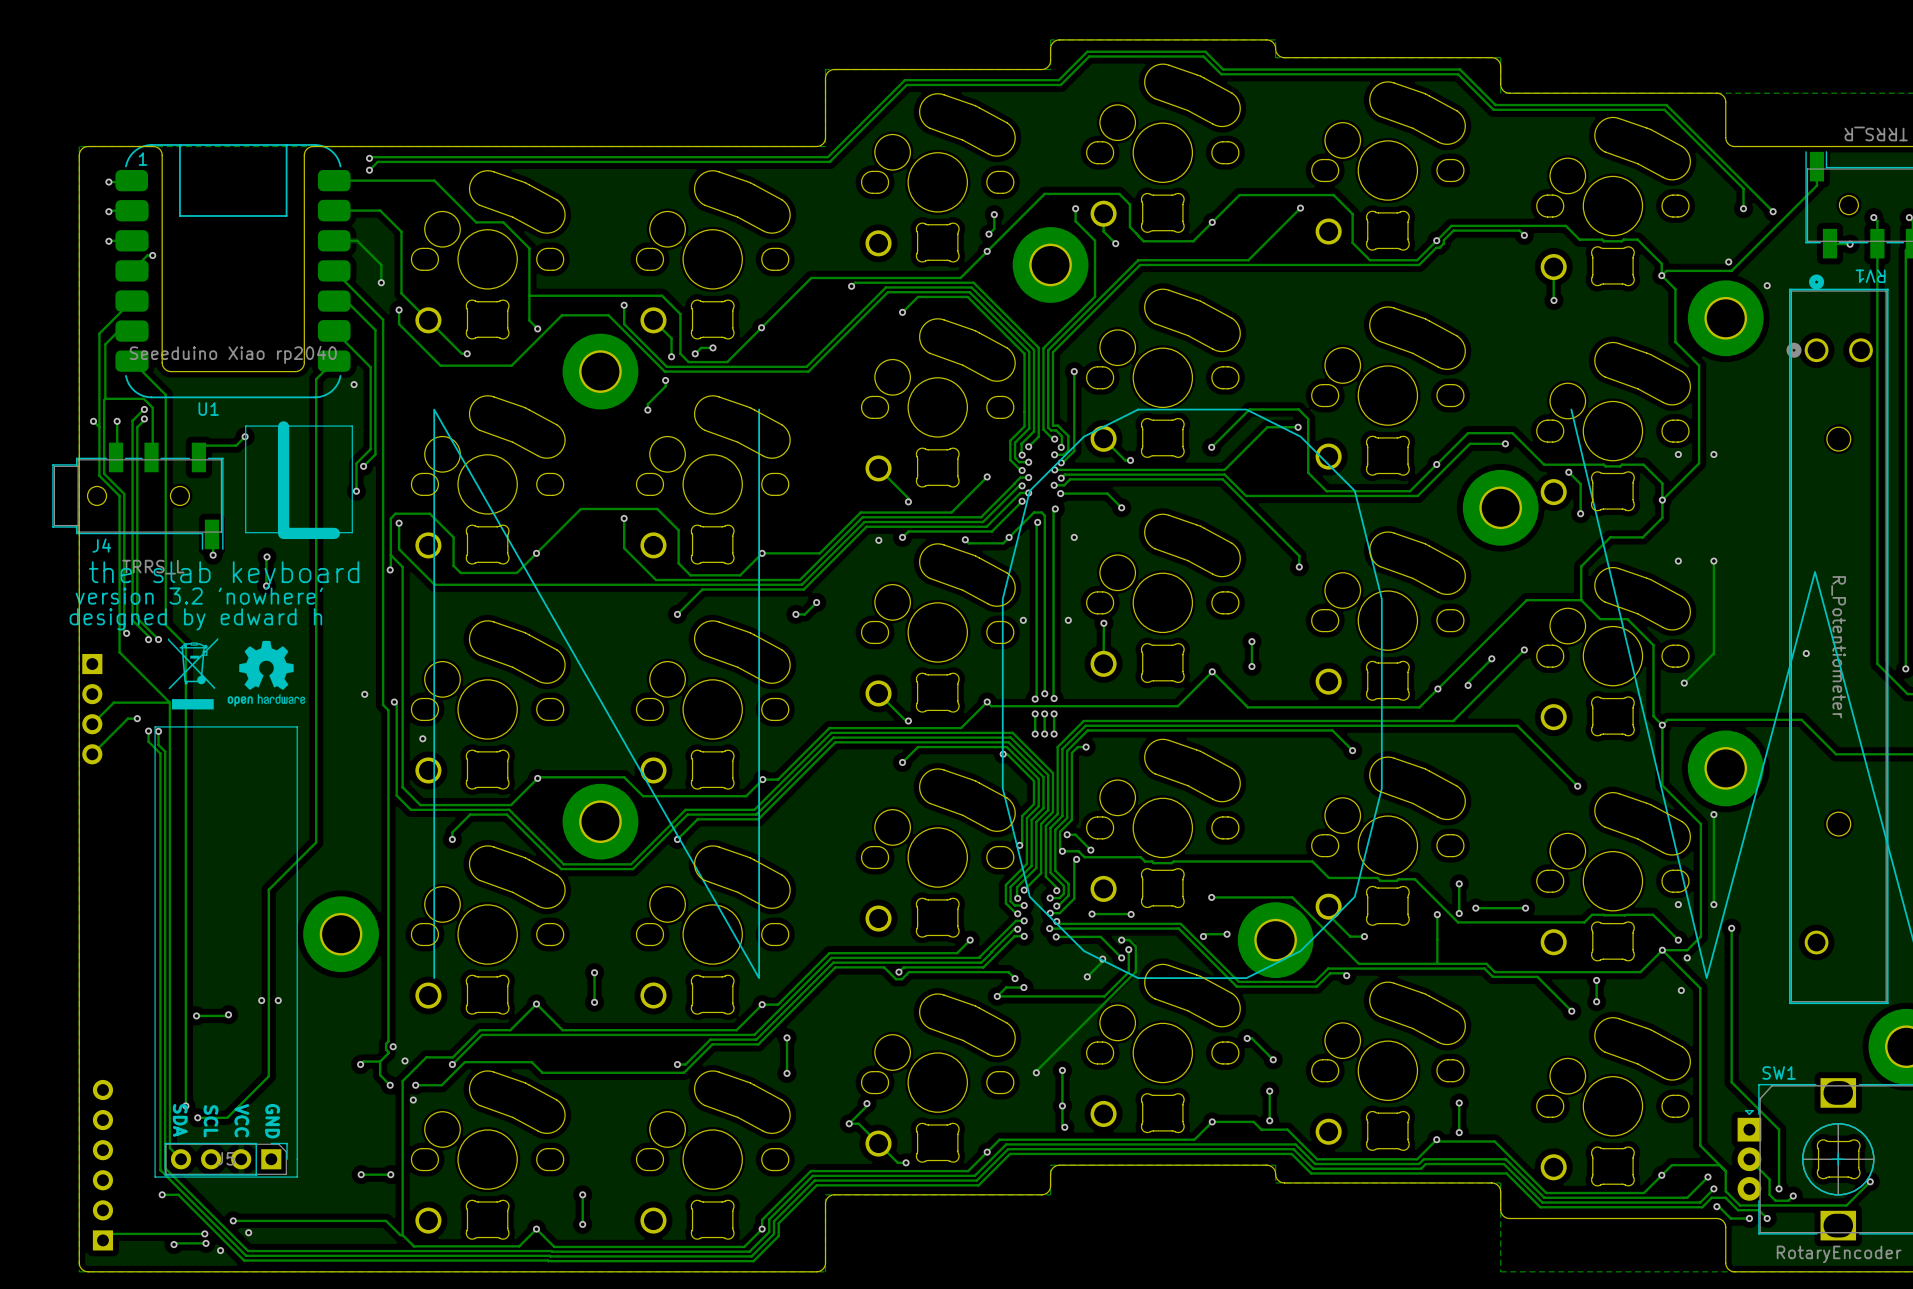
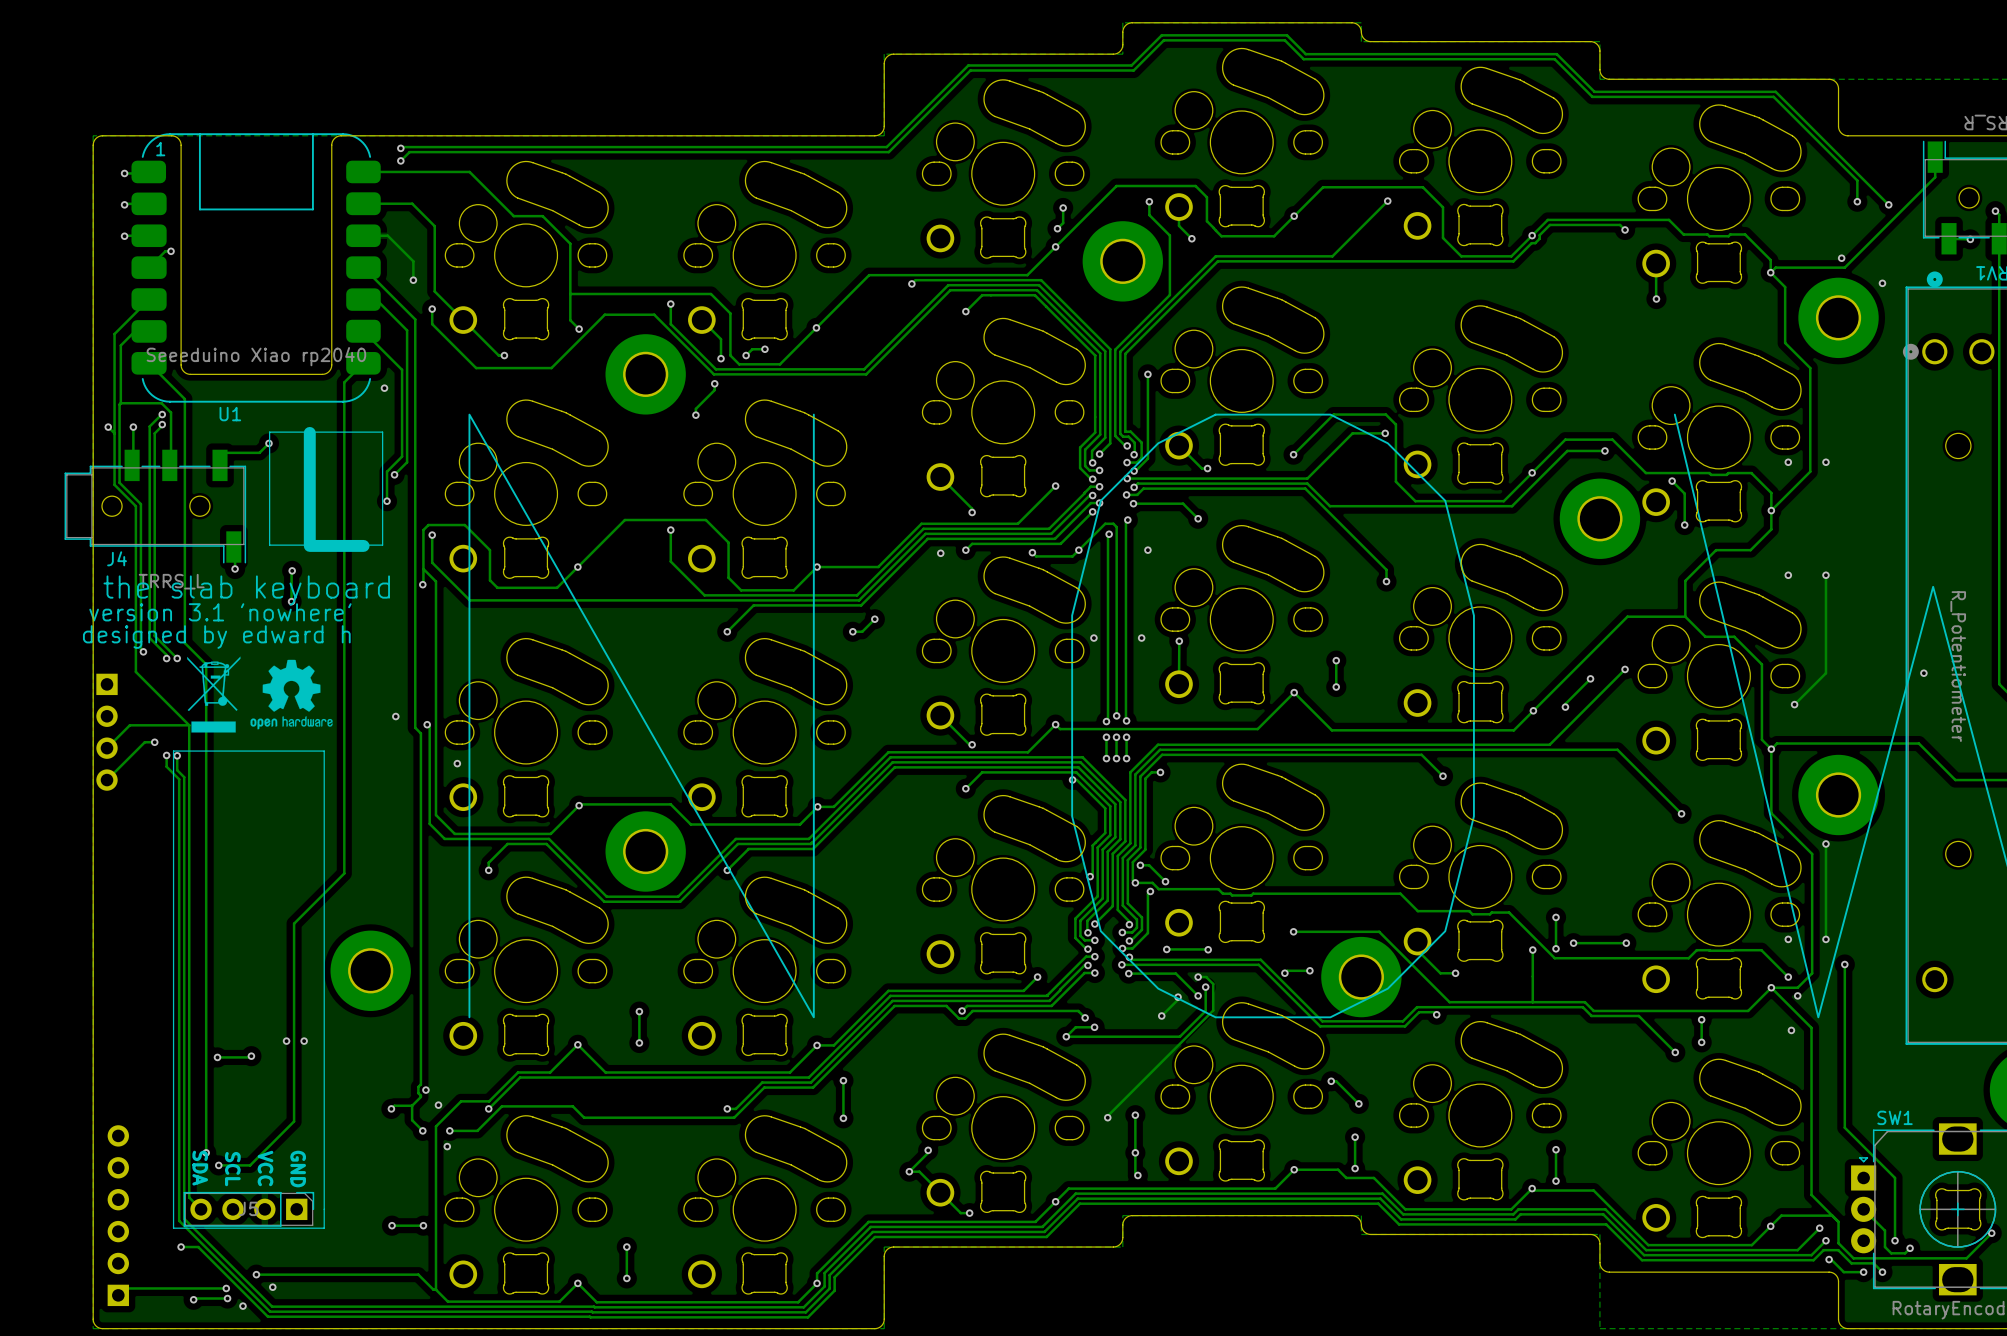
text: version 3.2 'nowhere' (199, 596) -> version 3.1 'nowhere' (220, 612)

